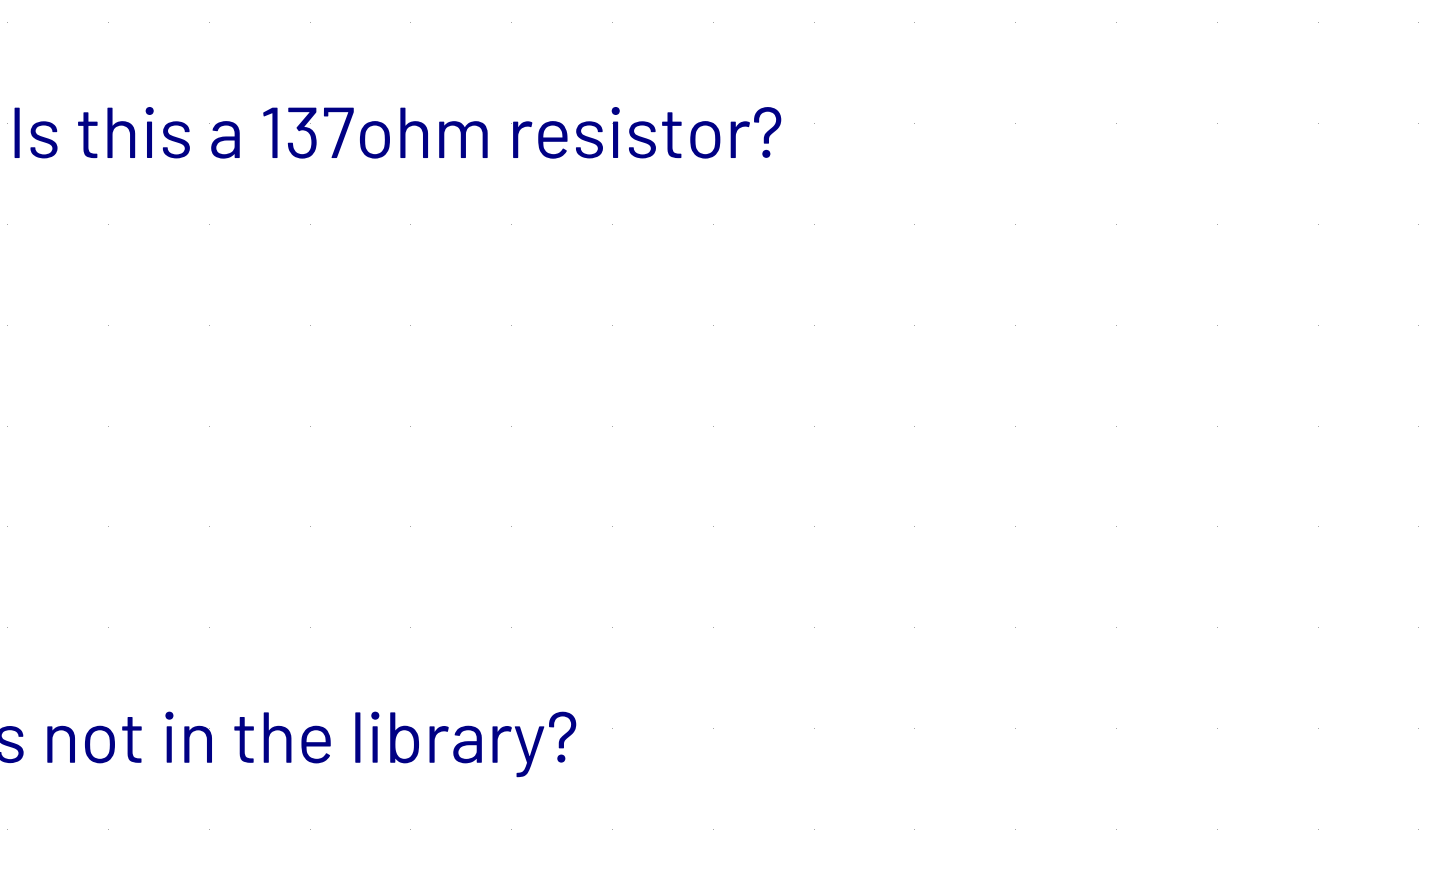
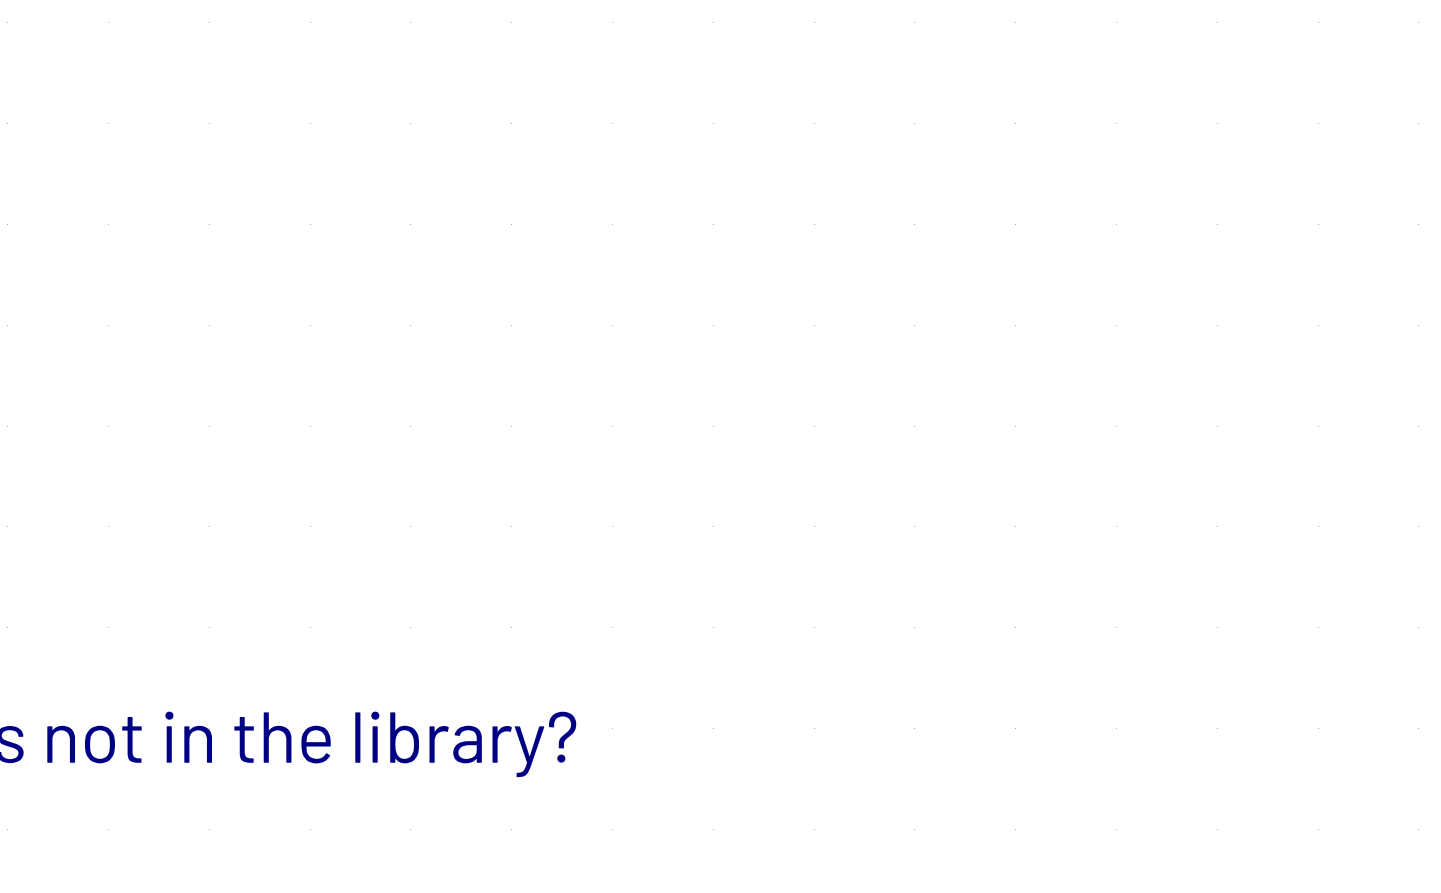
text: Is this a 137ohm resistor? (397, 132) -> none

